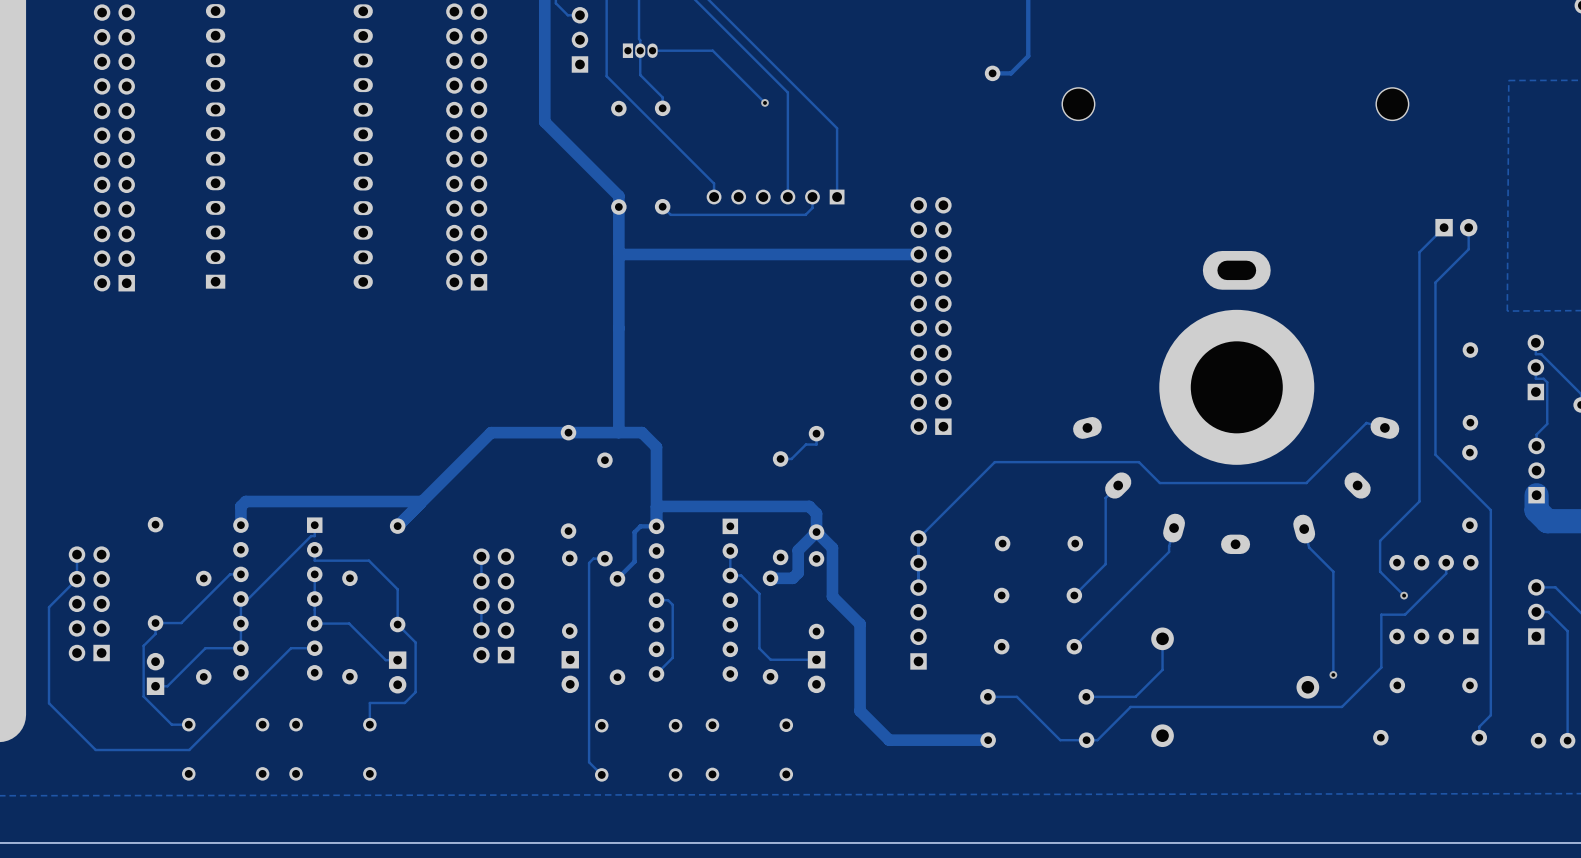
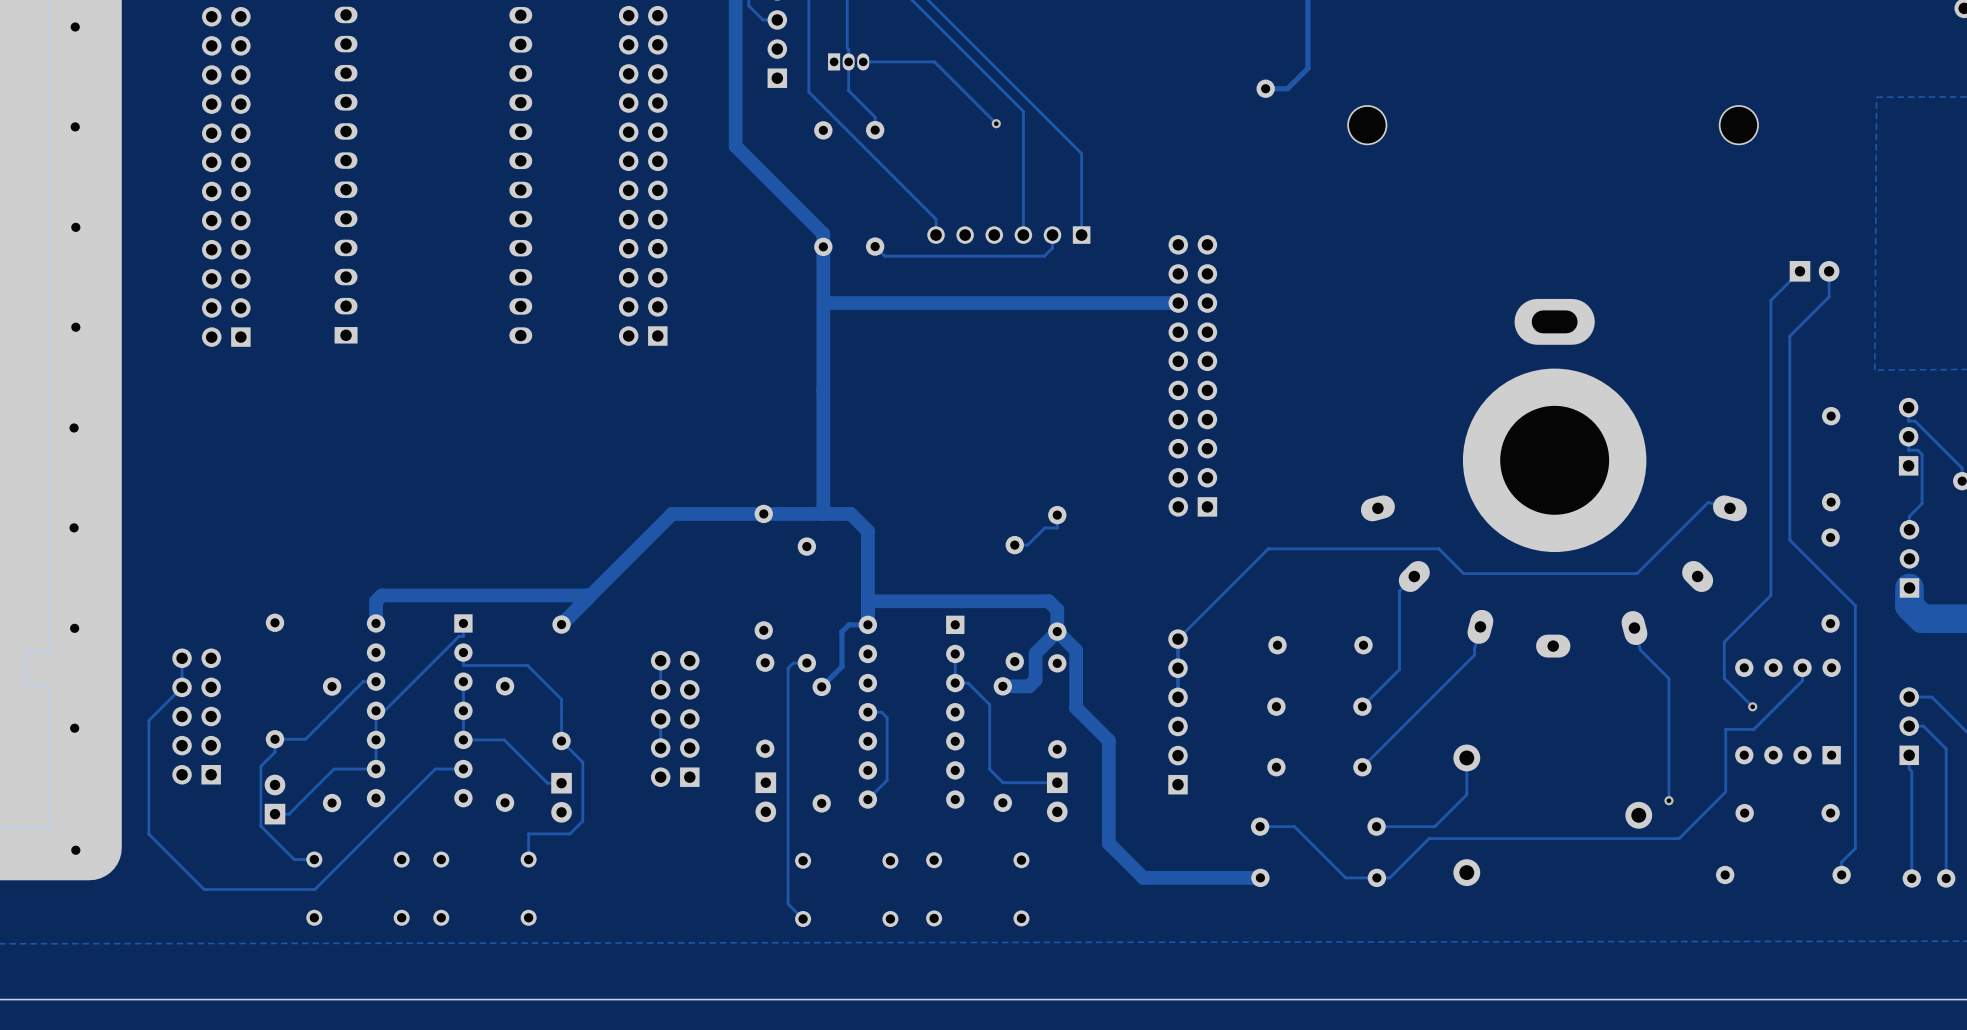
track: none -> (1909, 755) (1909, 768) (1911, 771) (1911, 878)

